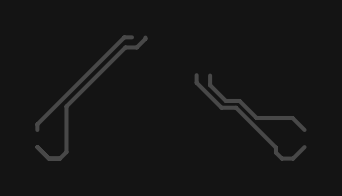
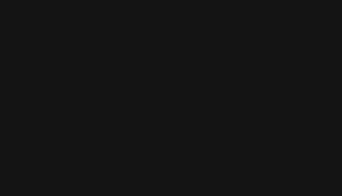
track: (131, 37) (124, 37) (37, 124) (37, 129) -> none
track: (145, 37) (136, 47) (125, 47) (66, 106) (66, 152) (59, 158) (48, 158) (37, 147) -> none
track: (196, 75) (196, 82) (221, 107) (236, 107) (275, 147) (275, 152) (281, 158) (293, 158) (304, 147) -> none
track: (210, 75) (210, 85) (225, 100) (239, 100) (256, 118) (292, 118) (304, 129) -> none

